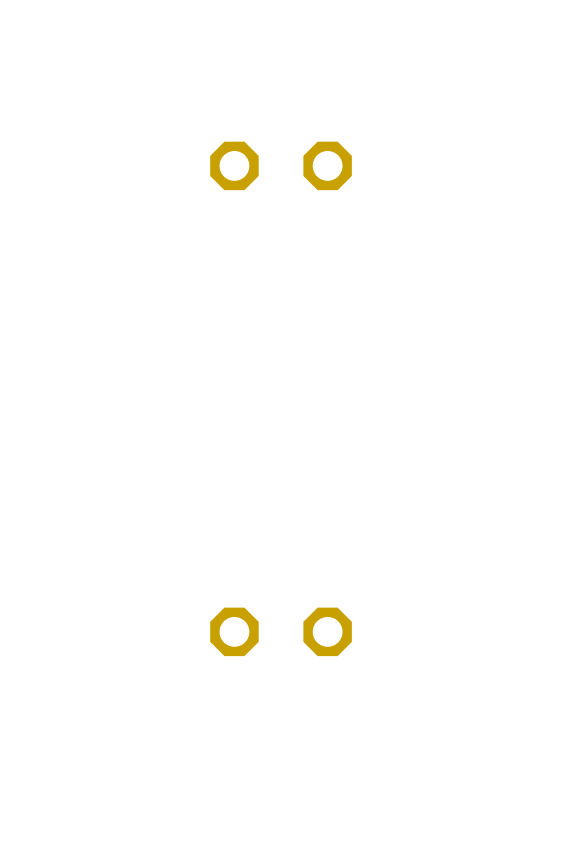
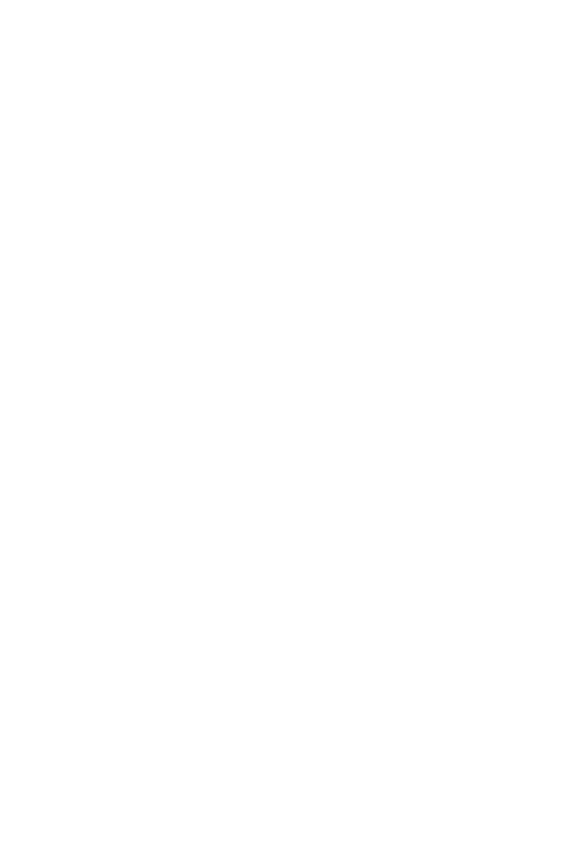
part: (281, 165) -> none
part: (281, 631) -> none

